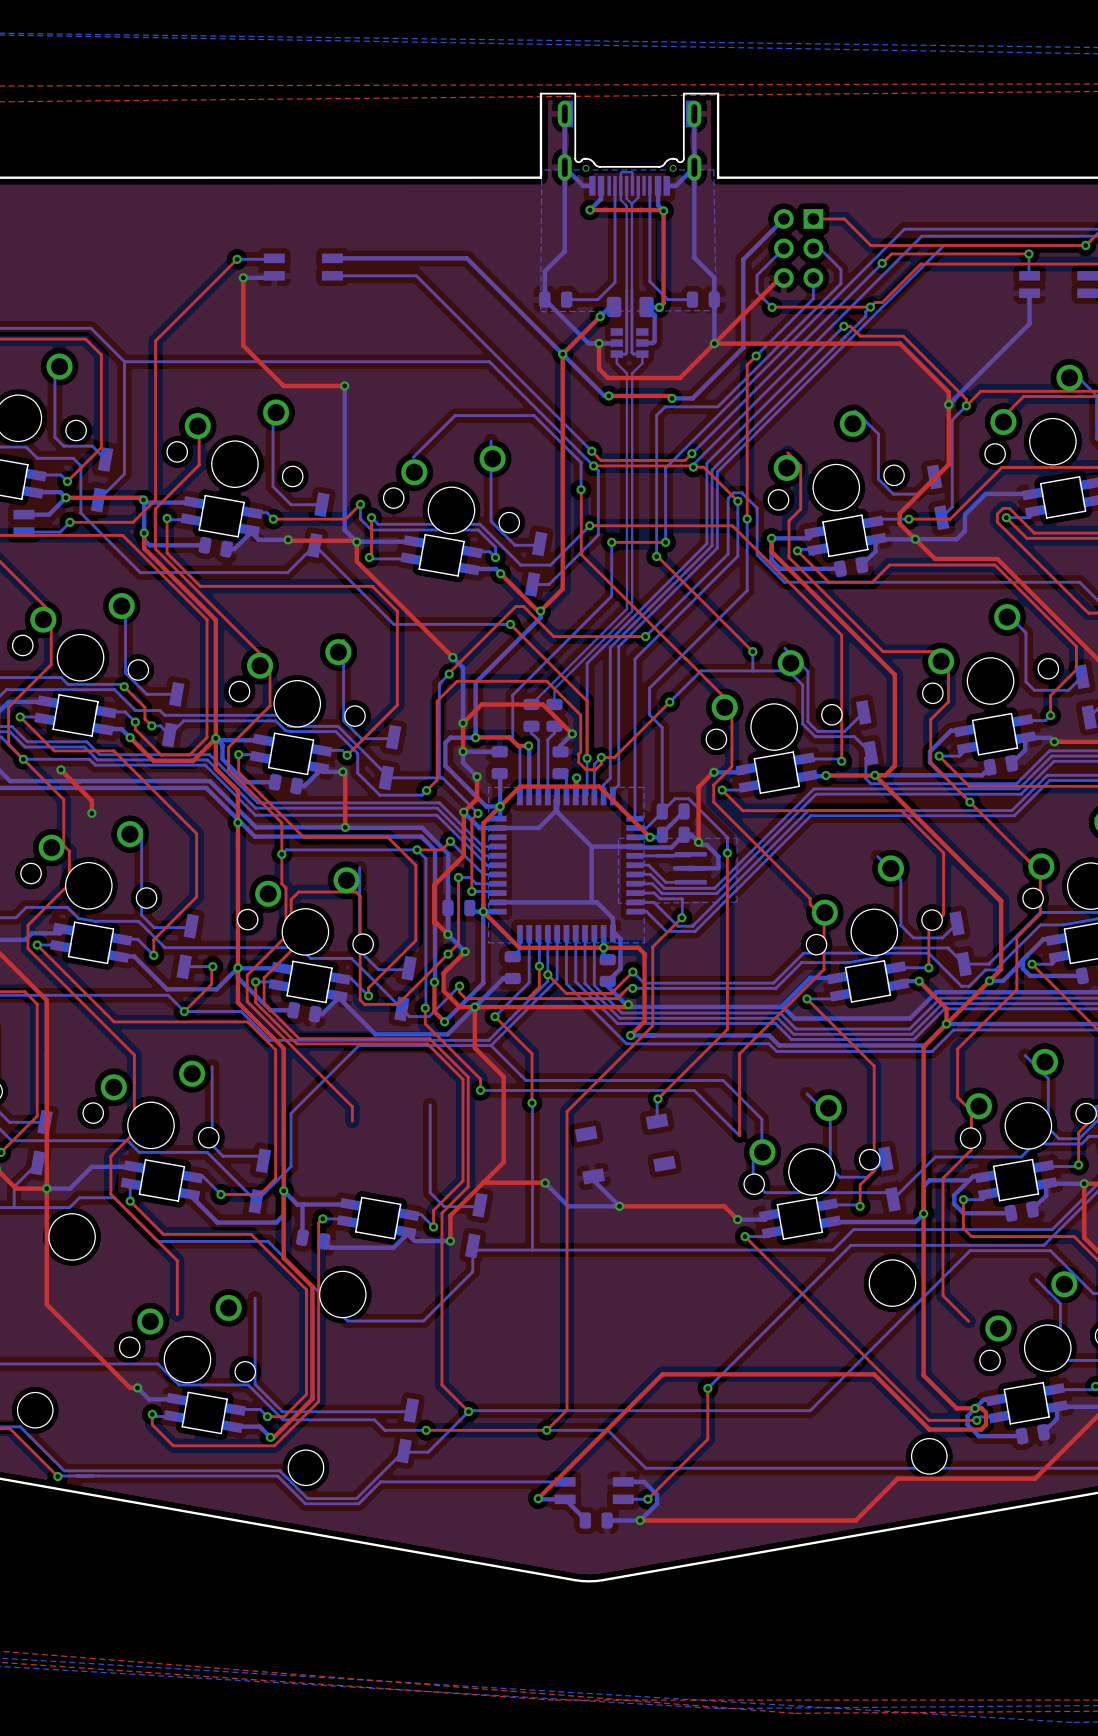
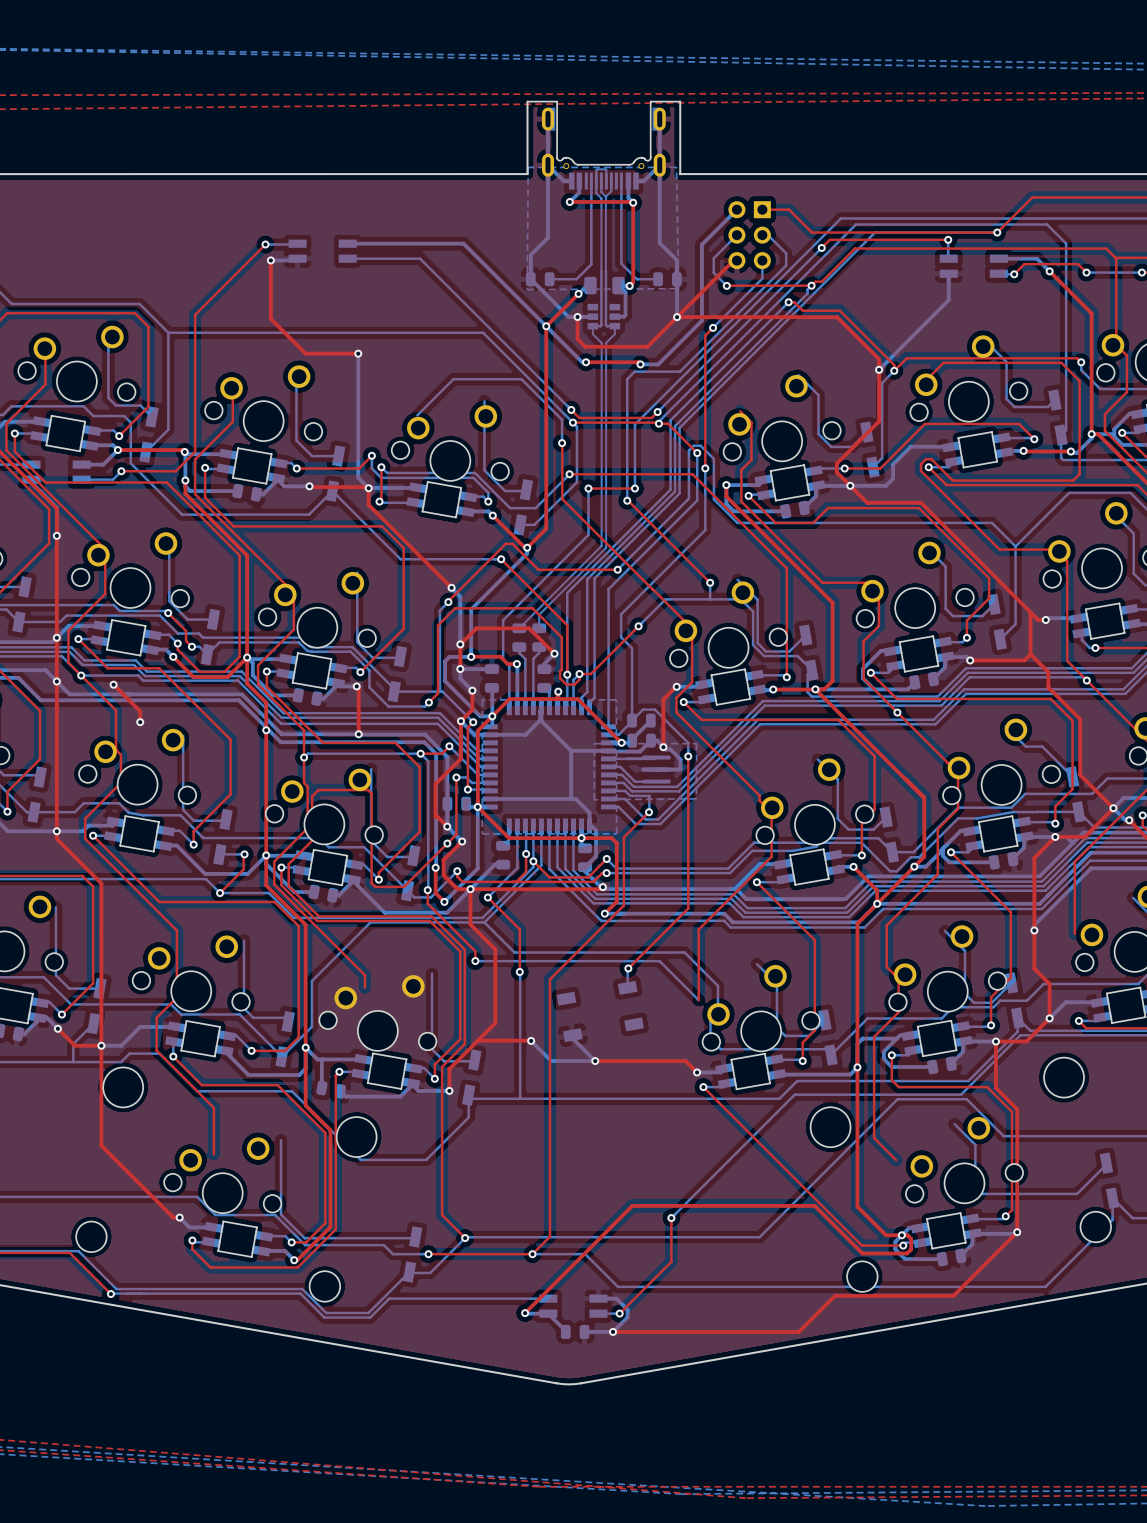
part: none -> (377, 1012)

